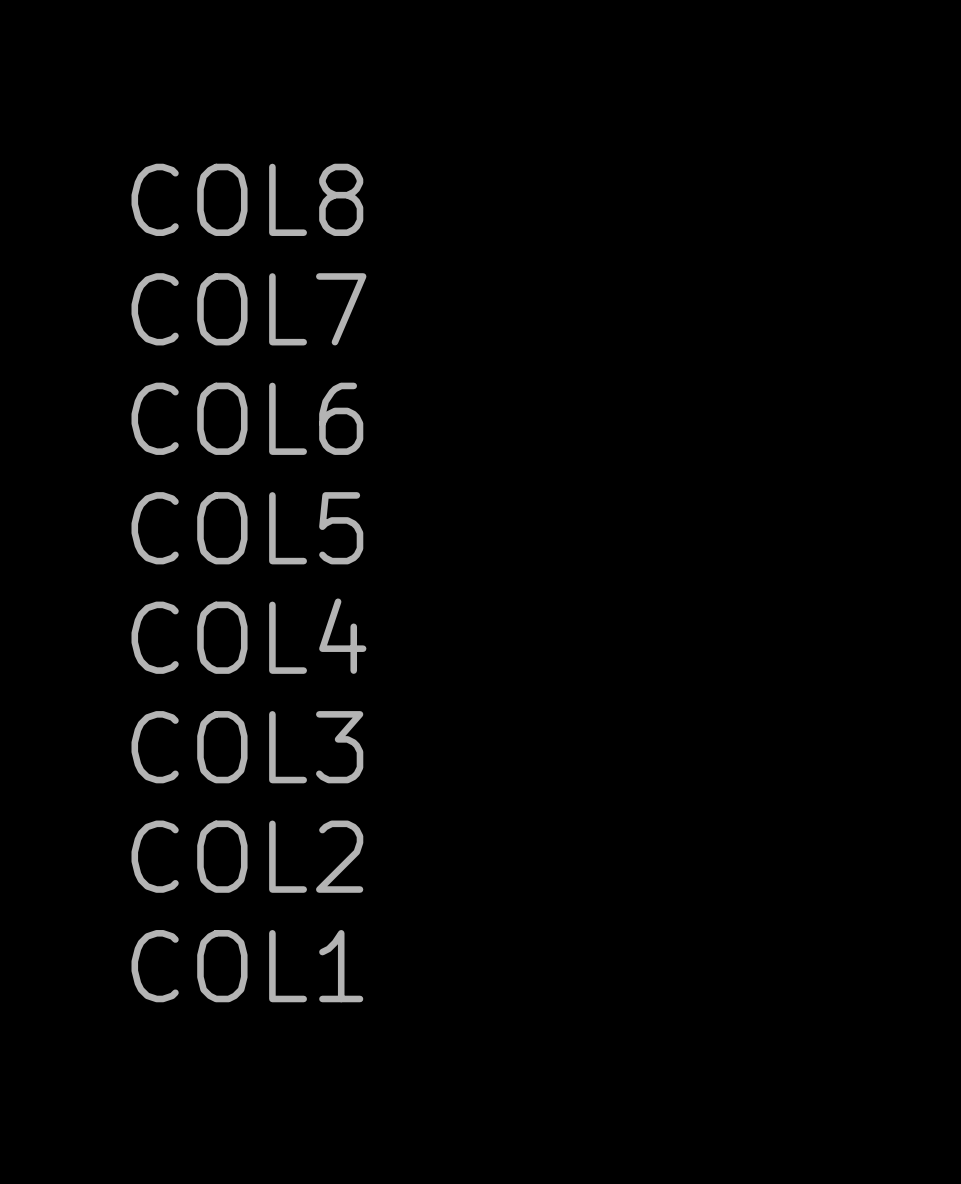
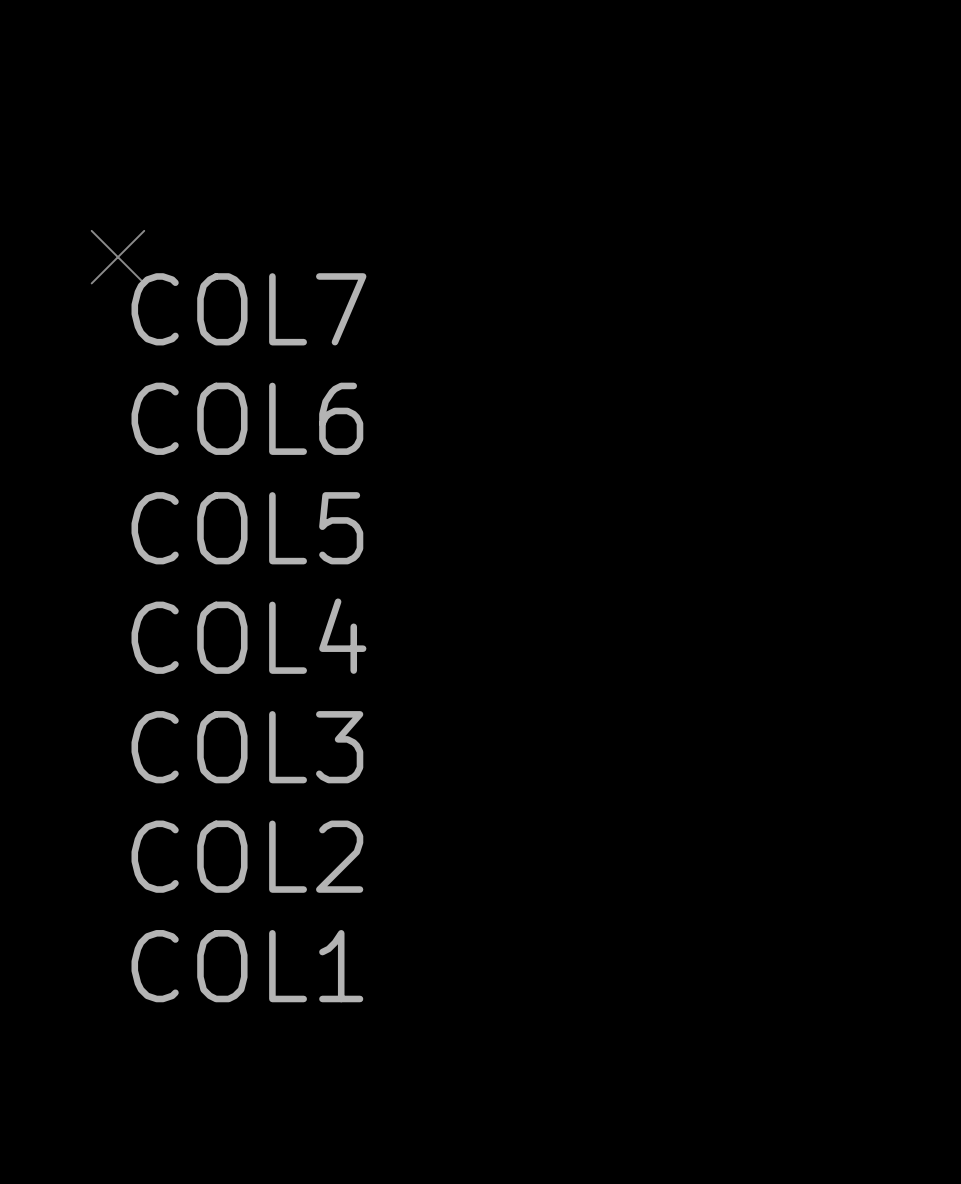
label: COL8 (247, 199) -> none
no-connect mark: none -> (117, 257)

